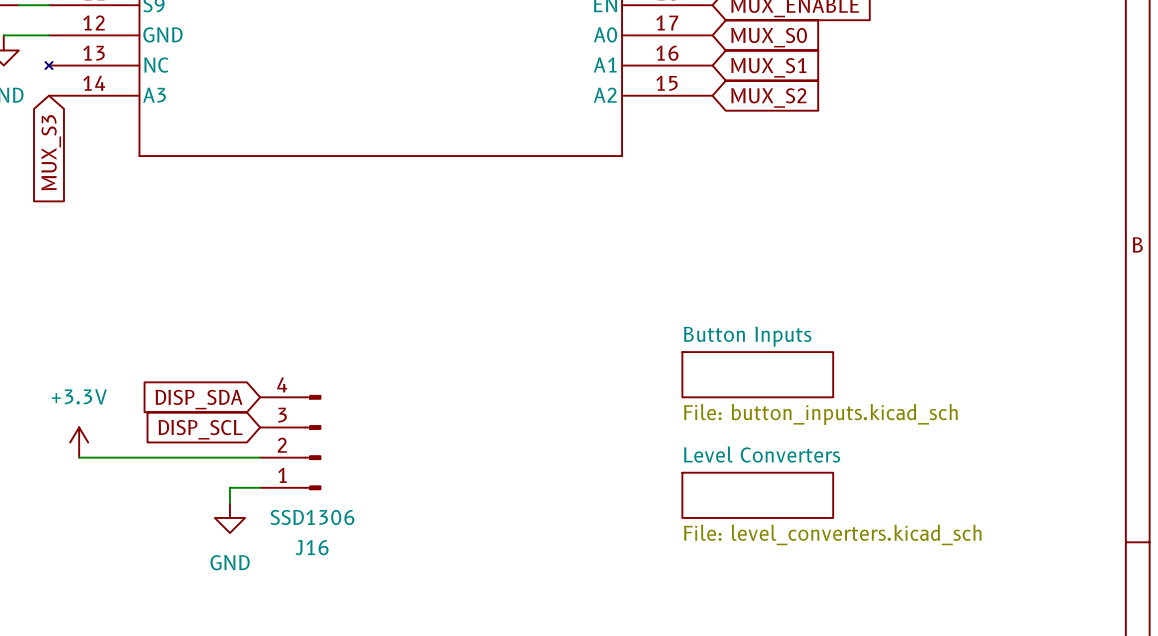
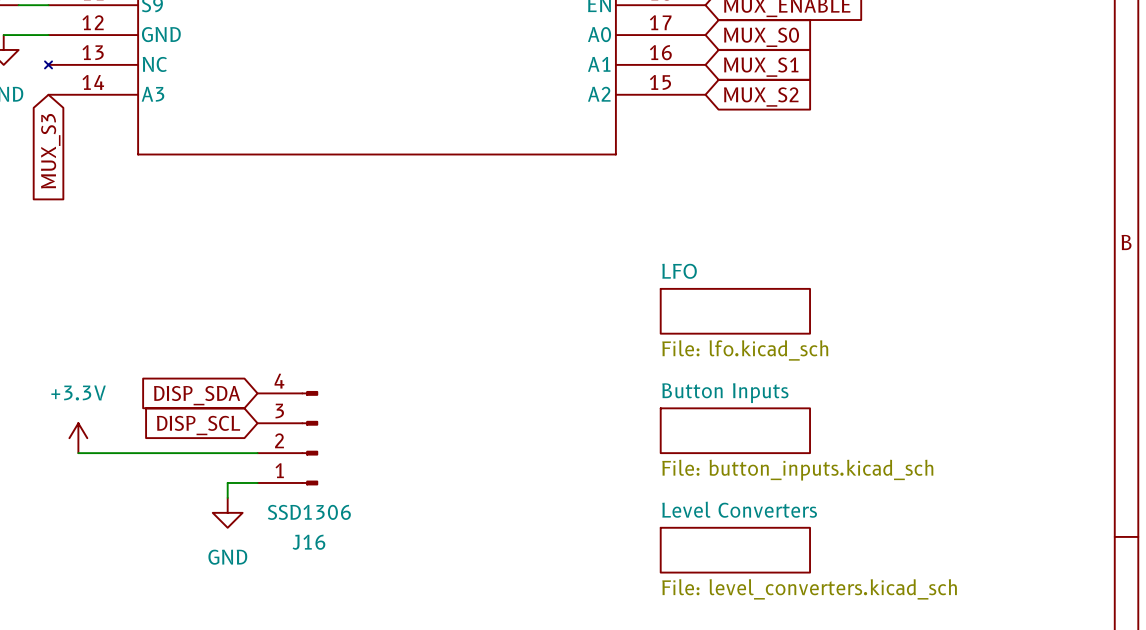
sheet LFO: none -> File: lfo.kicad_sch (735, 311)
sheet Button Inputs position: (757, 374) -> (735, 430)
sheet Level Converters position: (757, 495) -> (735, 550)

